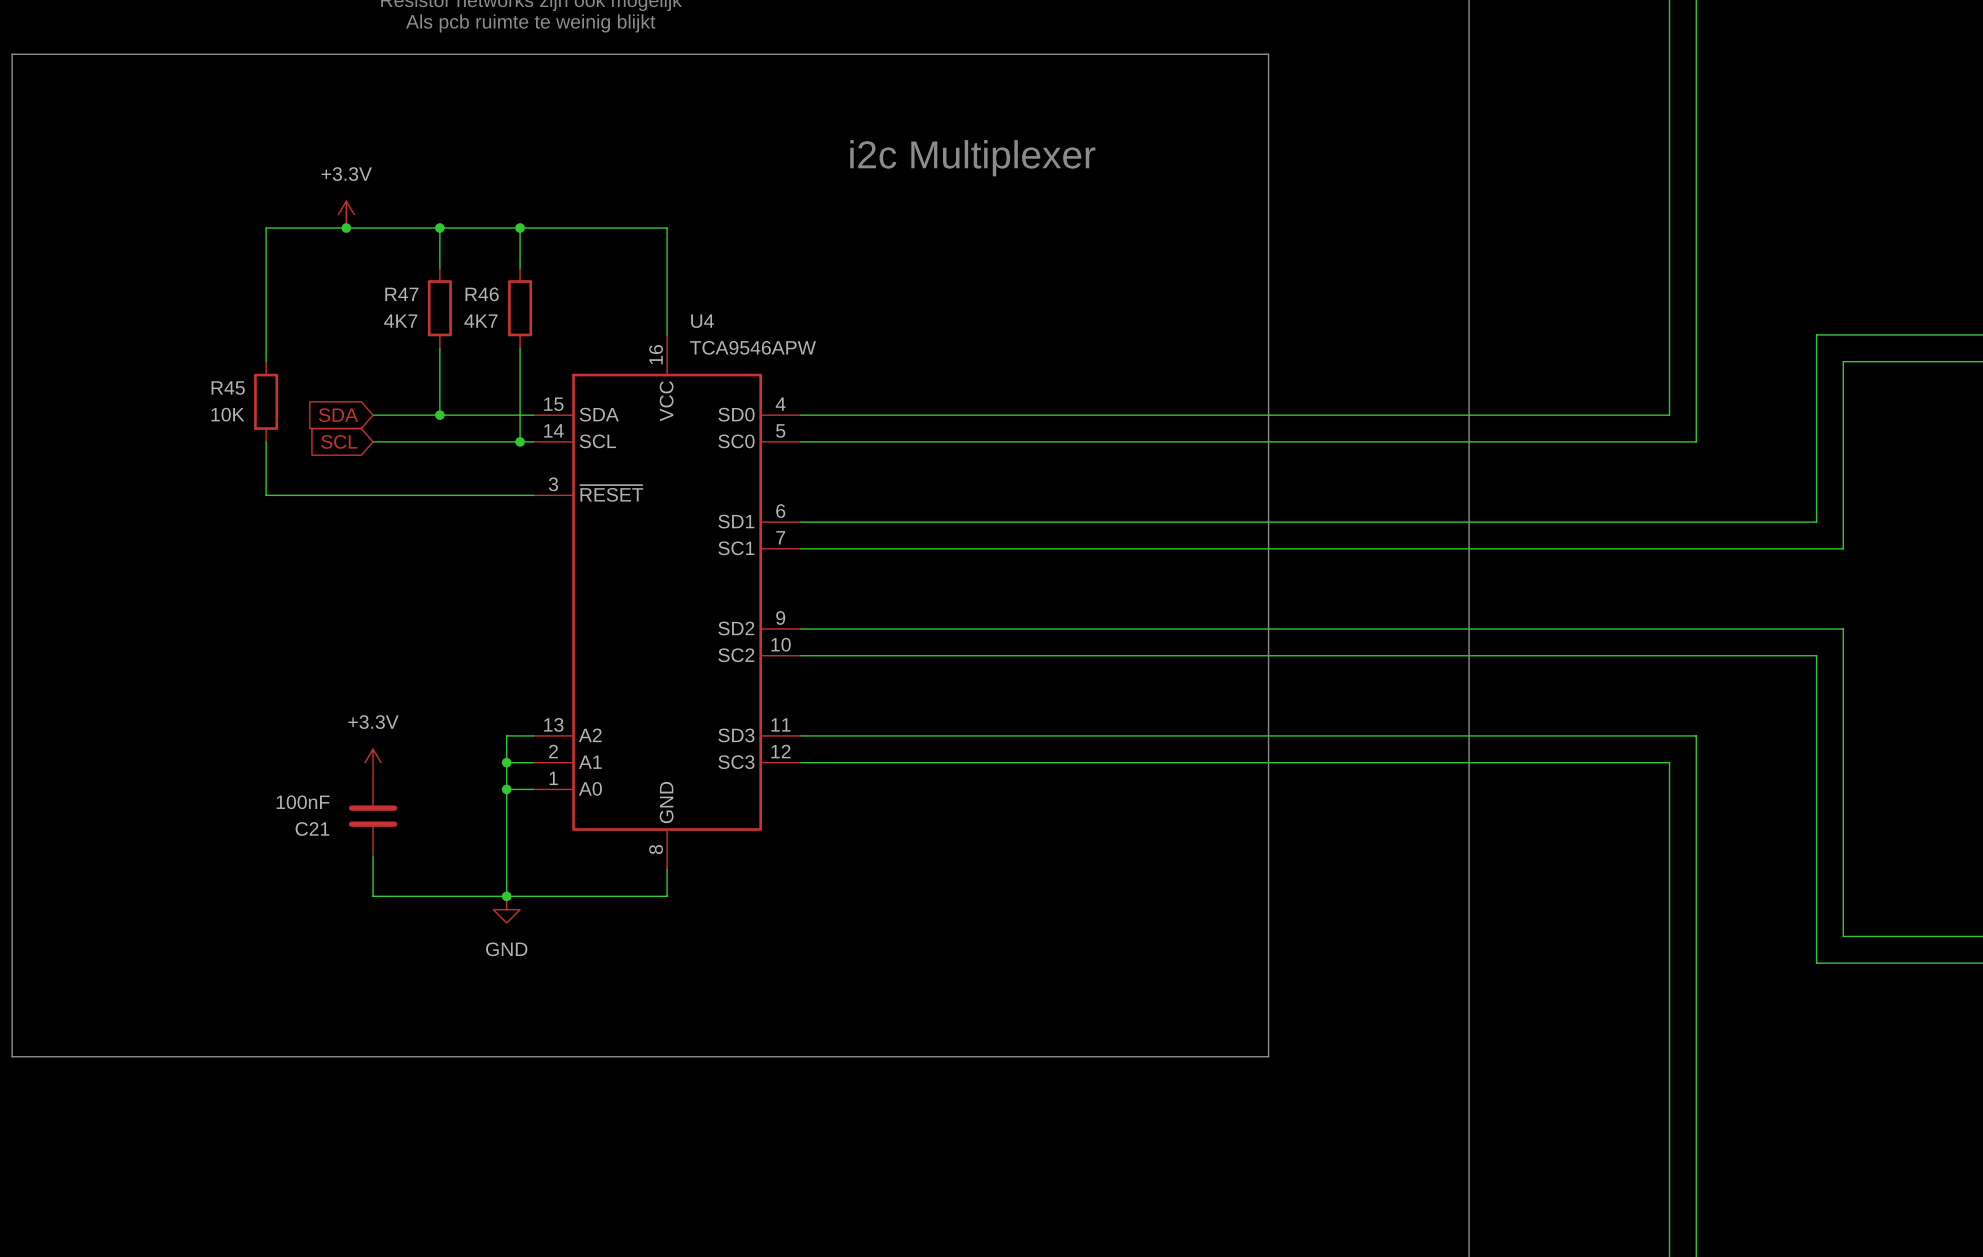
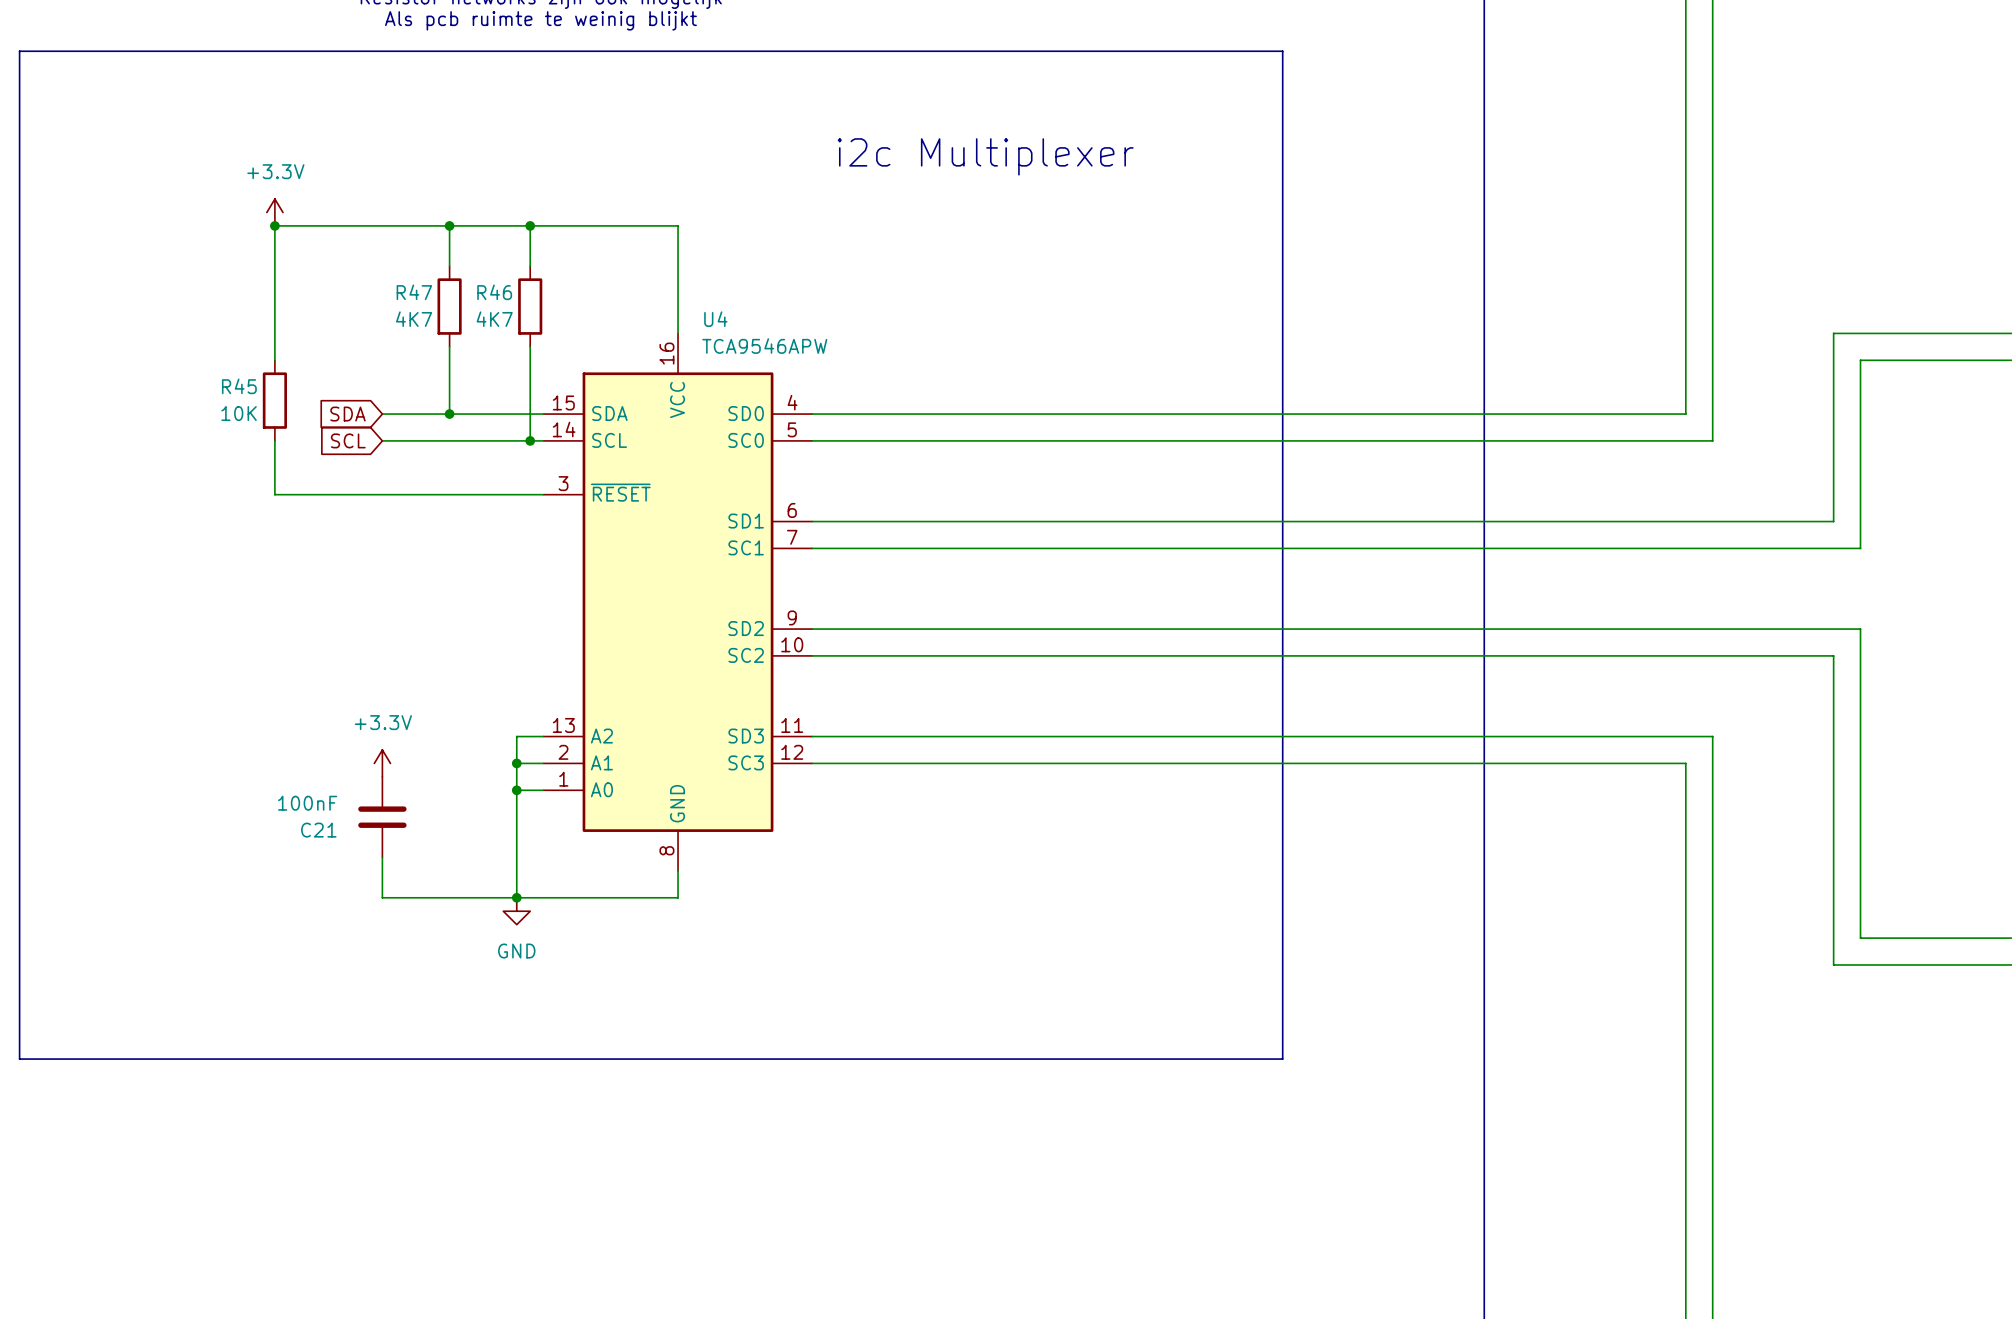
power symbol position: +3.3V (346, 214) -> +3.3V (274, 212)
junction: none -> (274, 225)
junction: (346, 228) -> none

